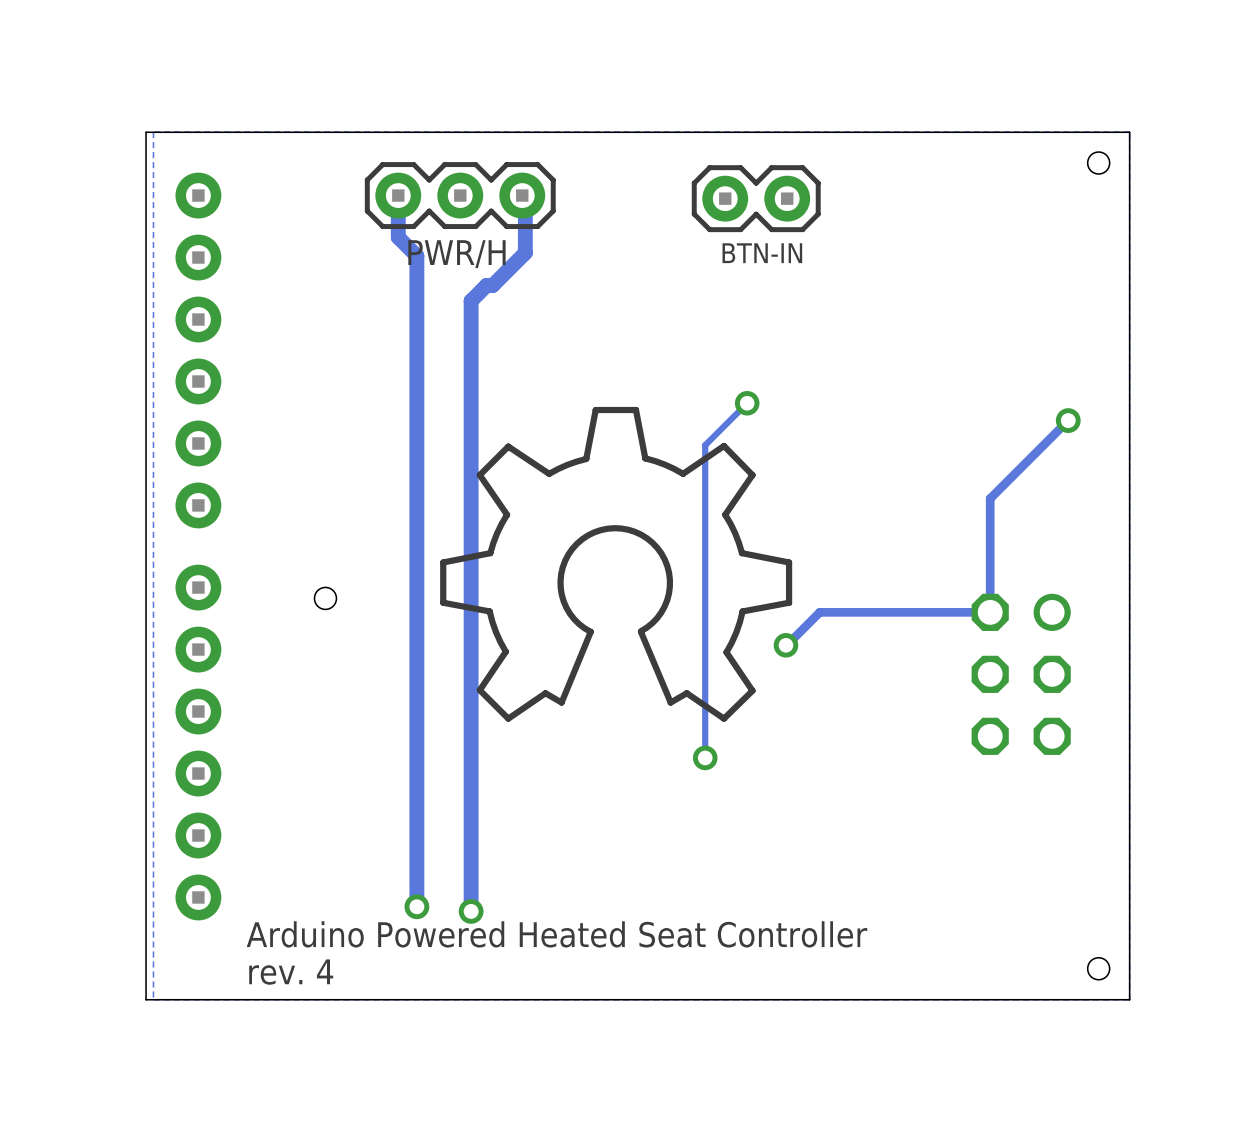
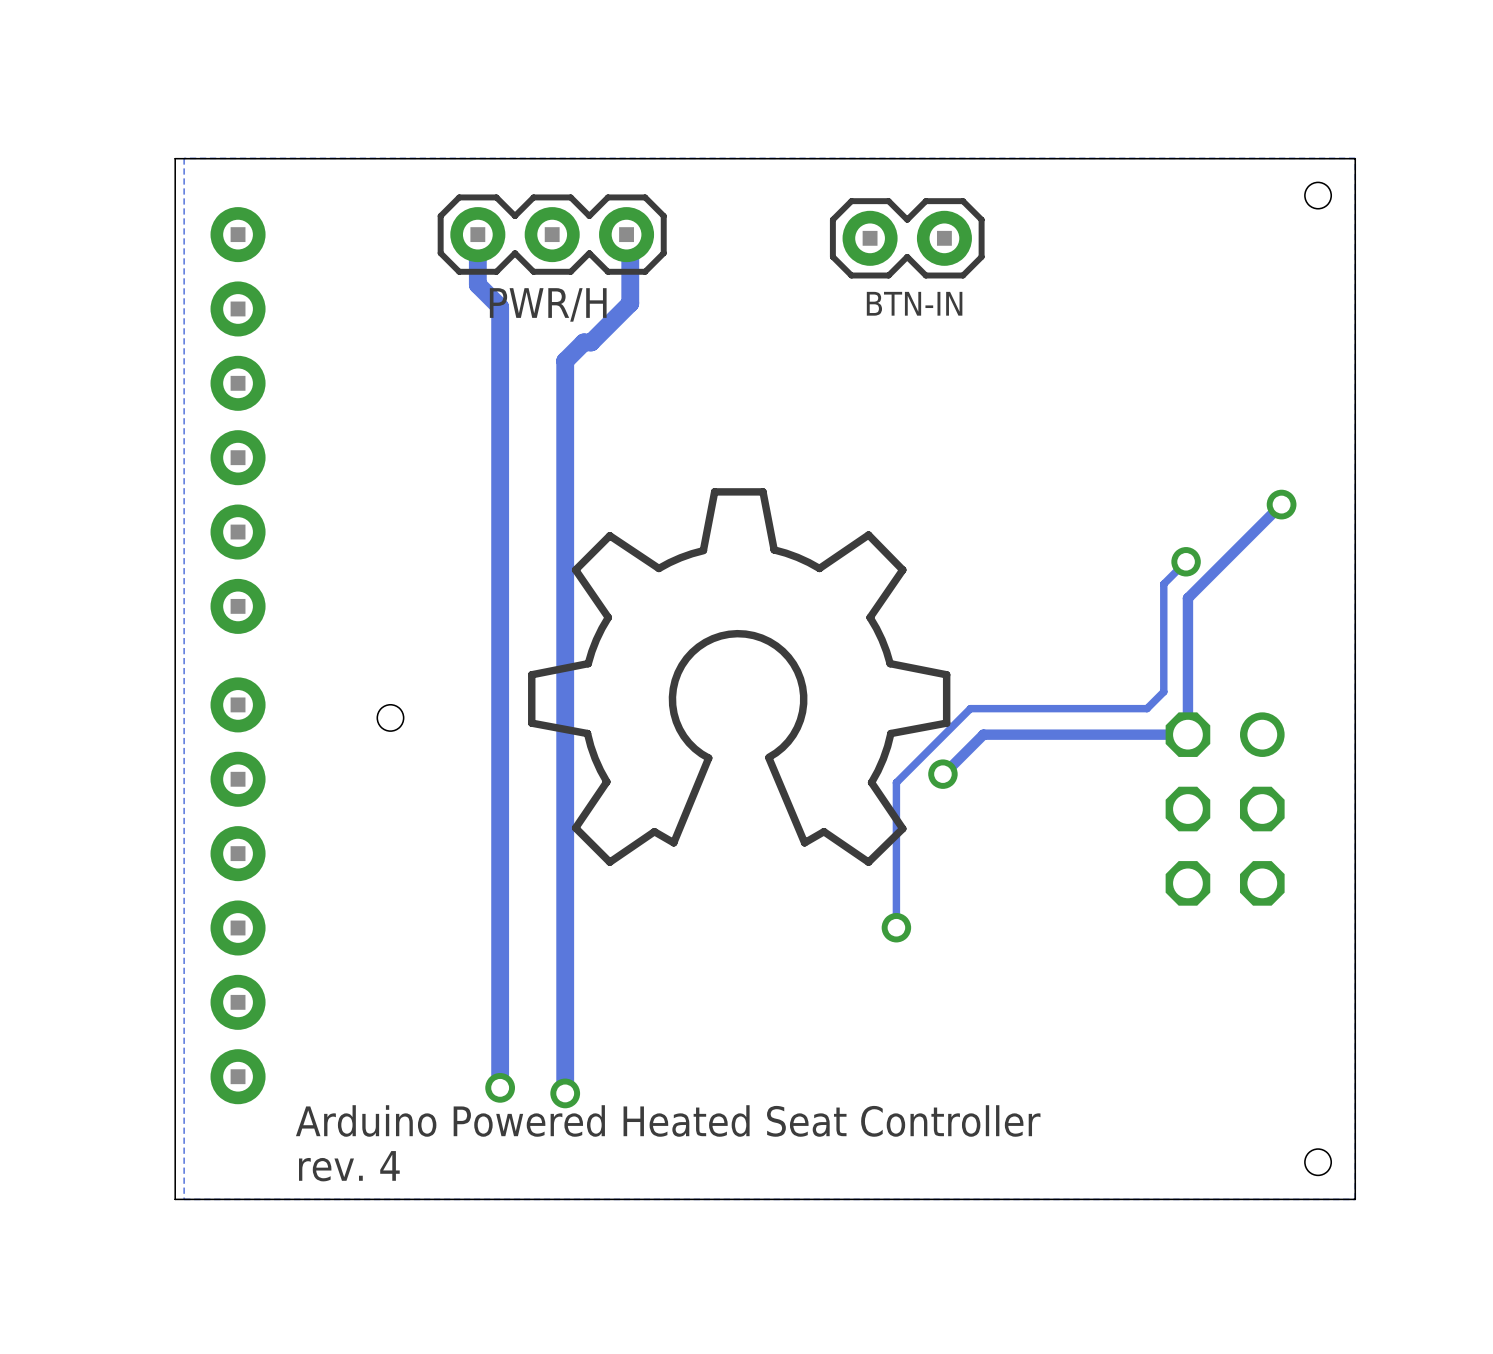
track: (747, 403) (705, 445) (705, 757) -> none
via: (747, 403) -> none
track: none -> (1186, 561) (1163, 584) (1163, 691) (1147, 708) (970, 708) (896, 782) (896, 927)
via: none -> (1186, 561)
via position: (705, 757) -> (896, 927)

